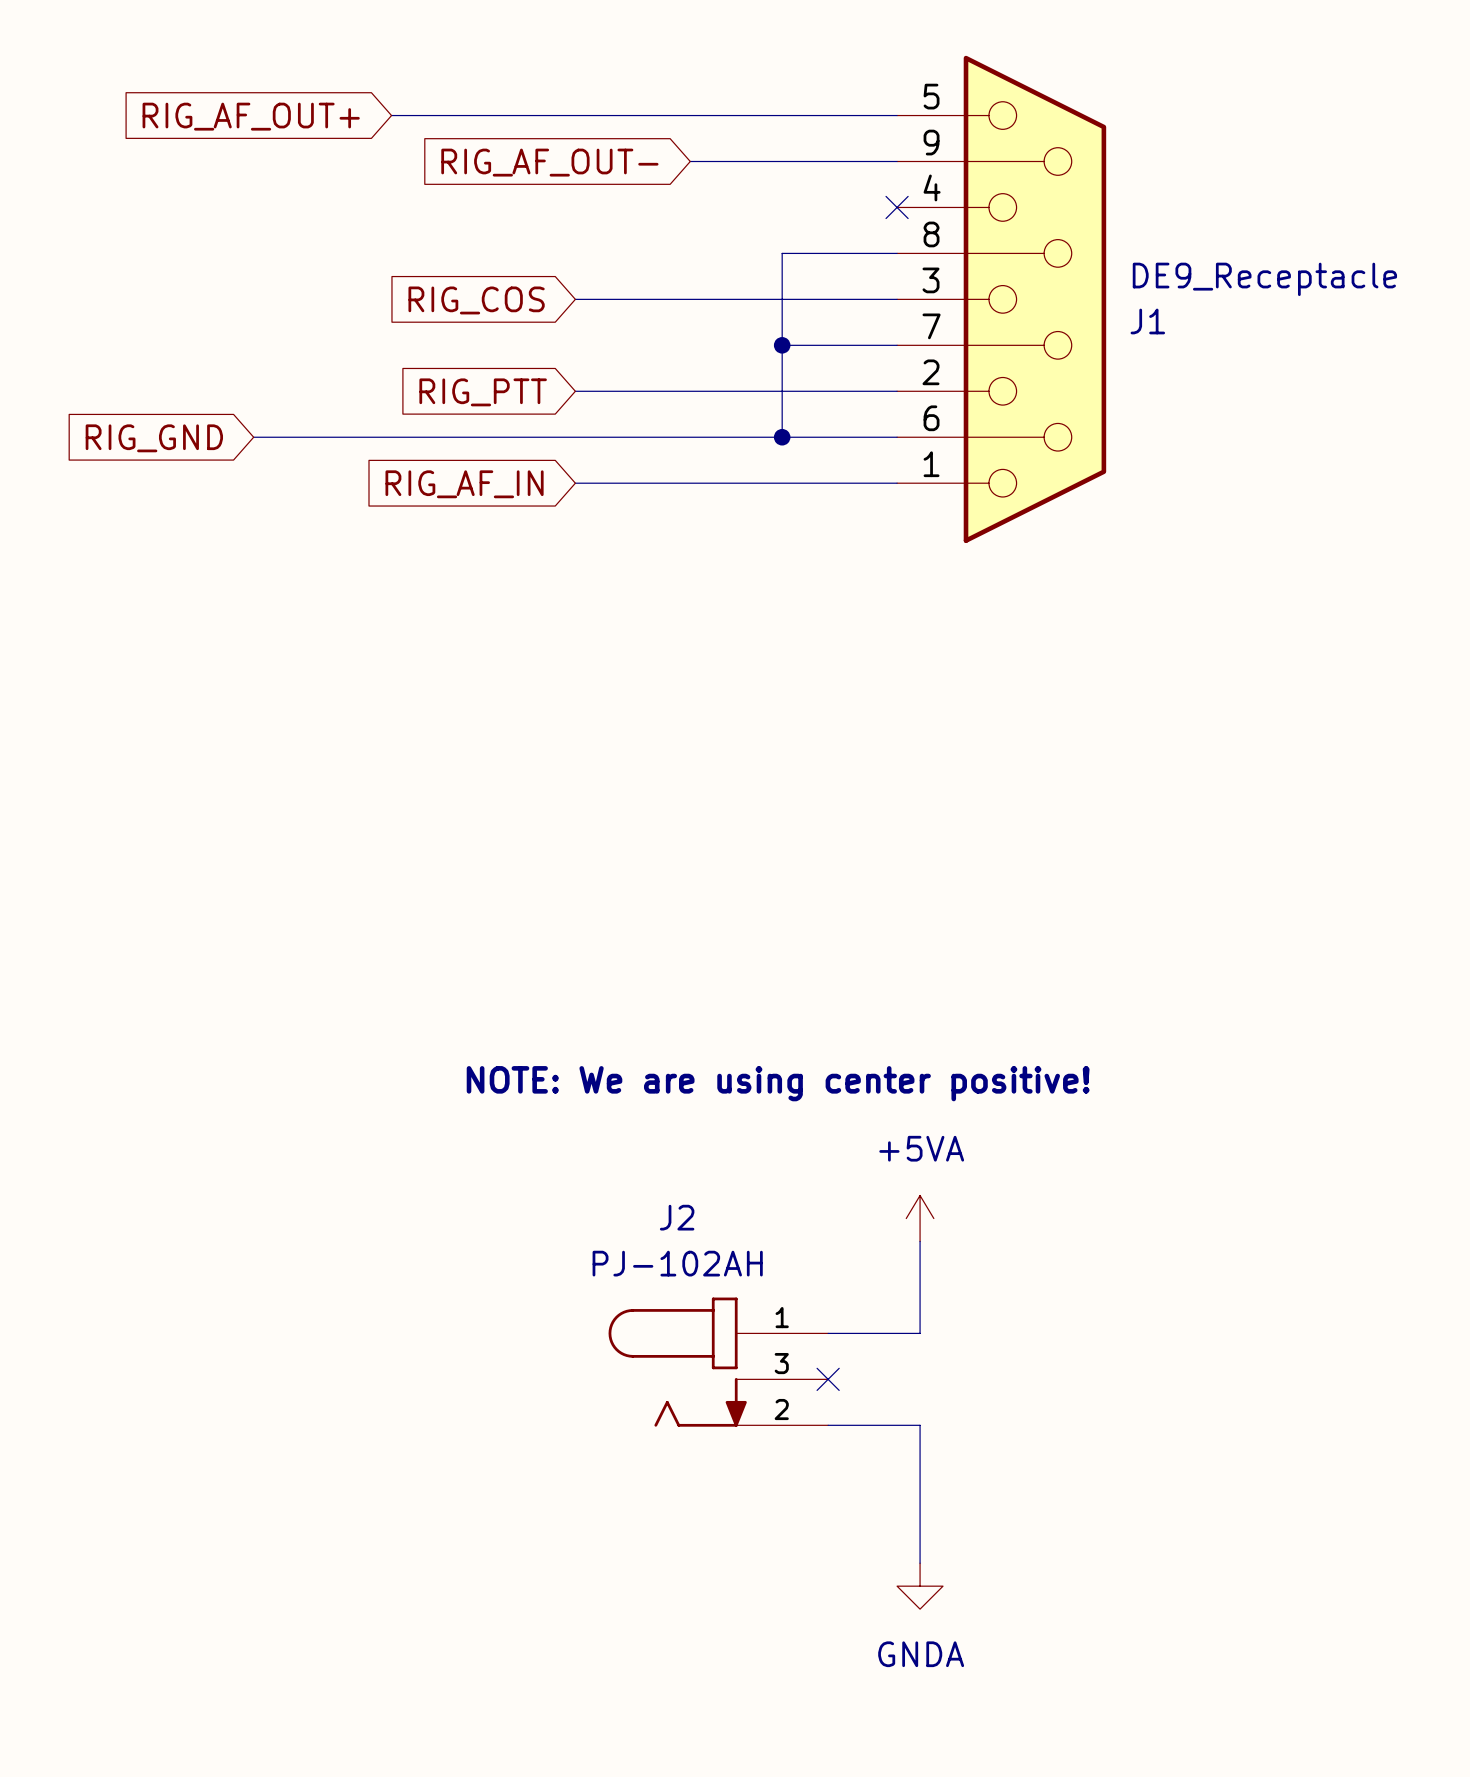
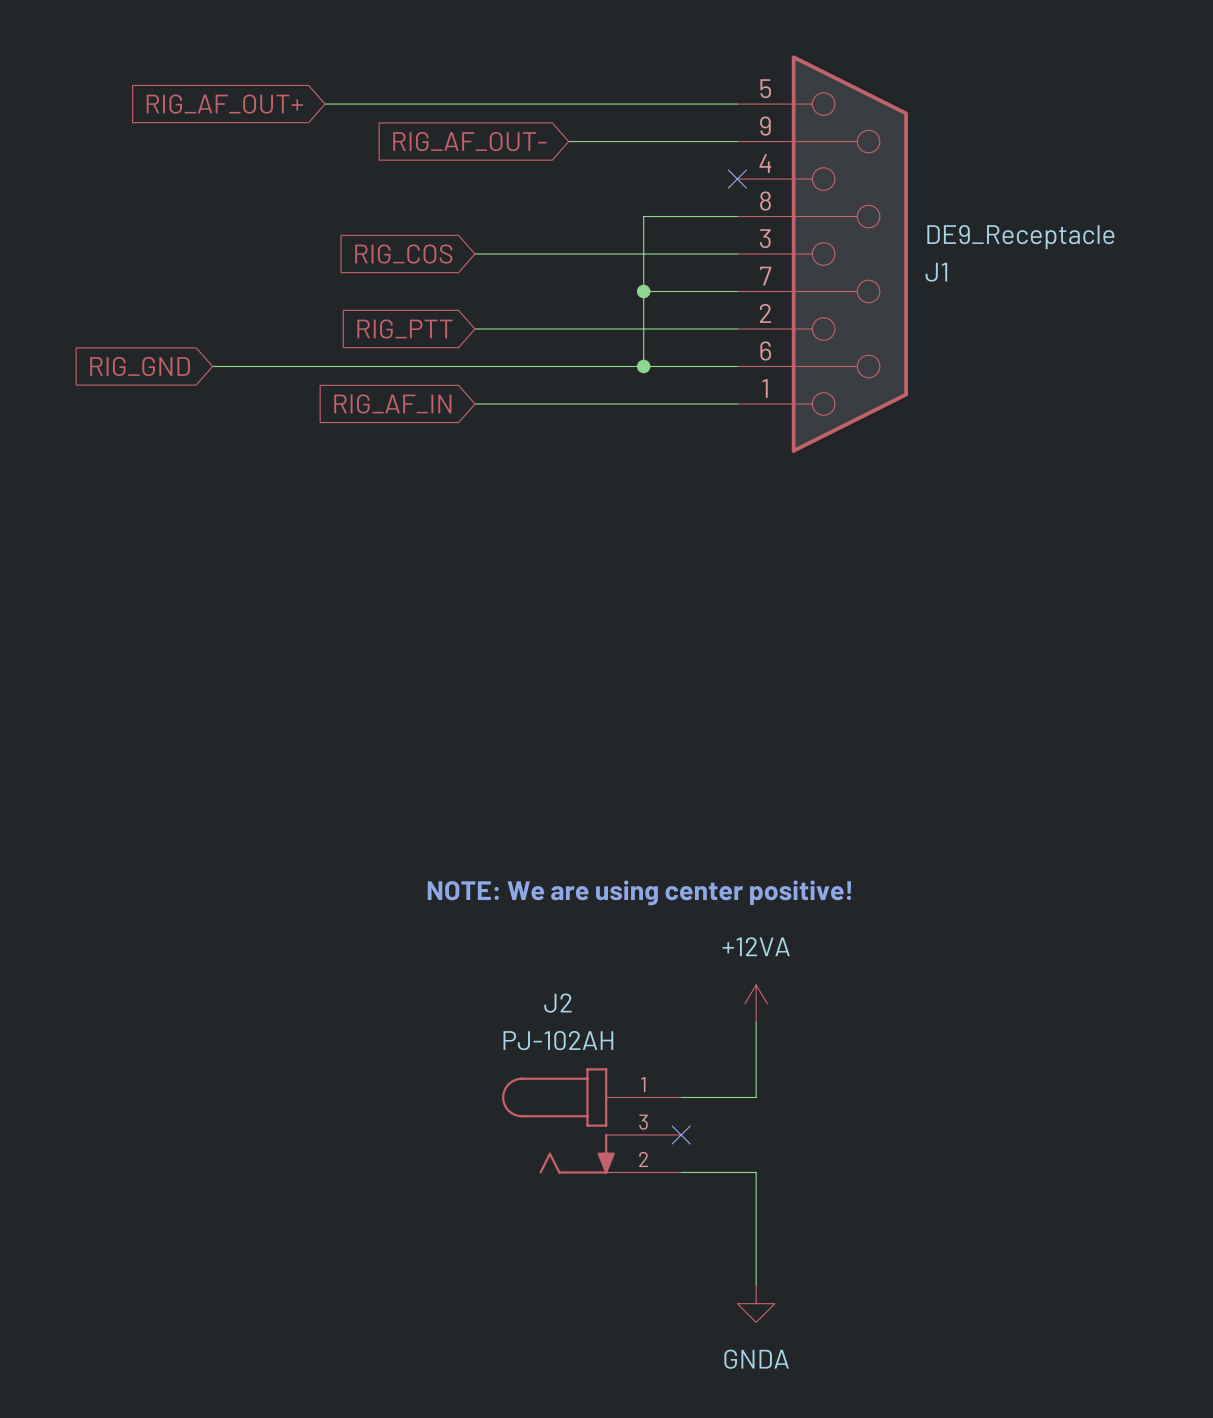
power symbol: +5VA (920, 1218) -> +12VA (756, 1003)

